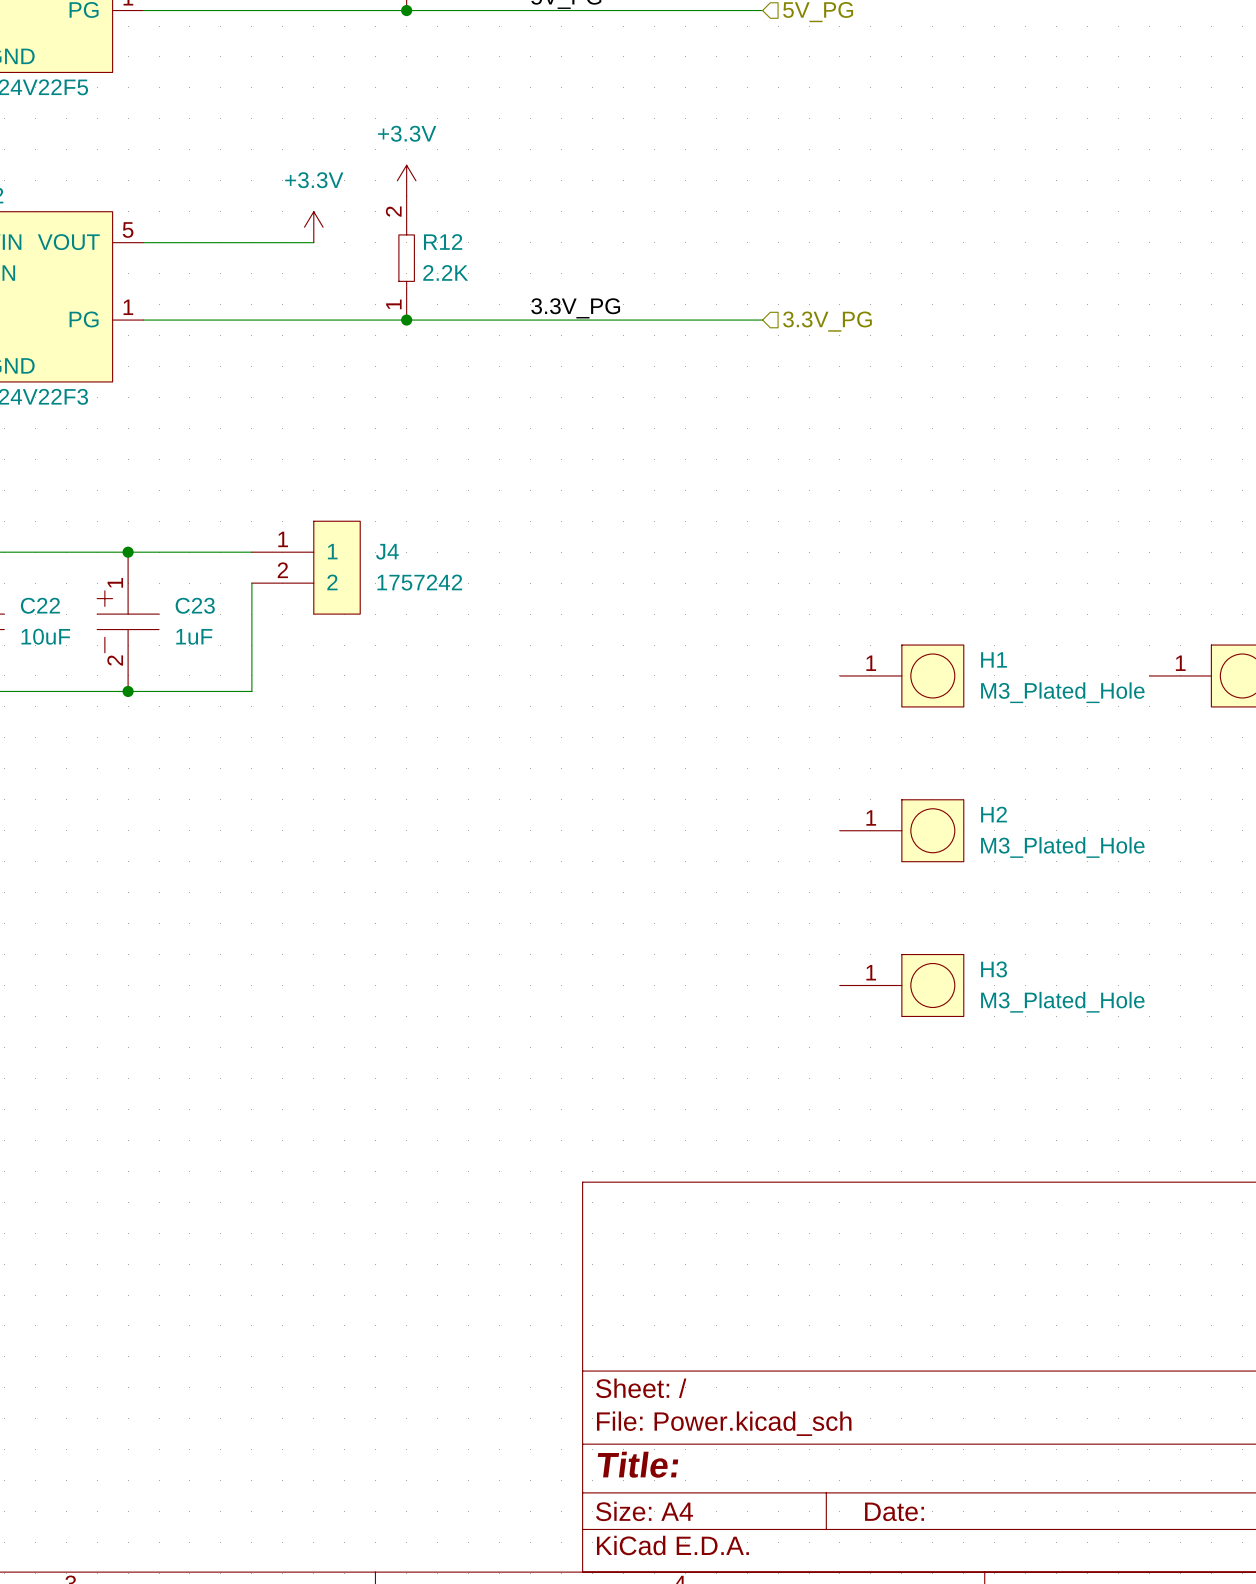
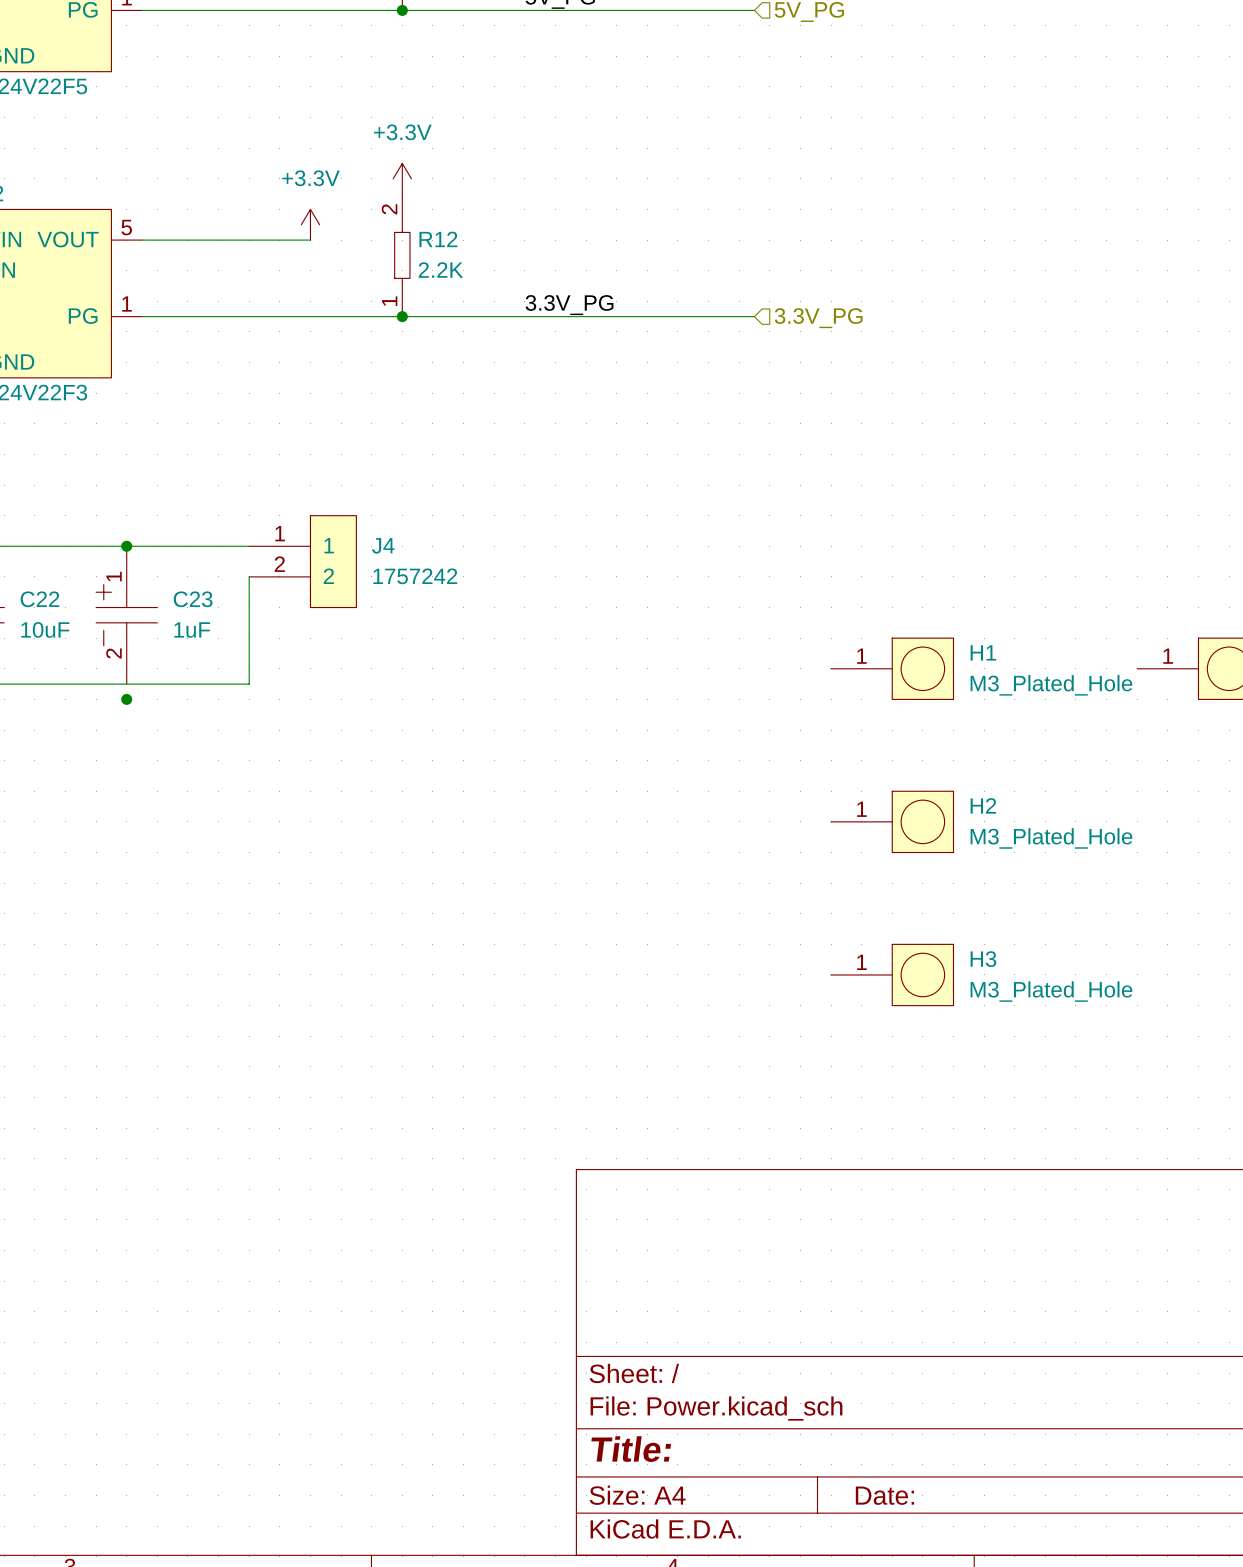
junction position: (128, 691) -> (126, 699)

